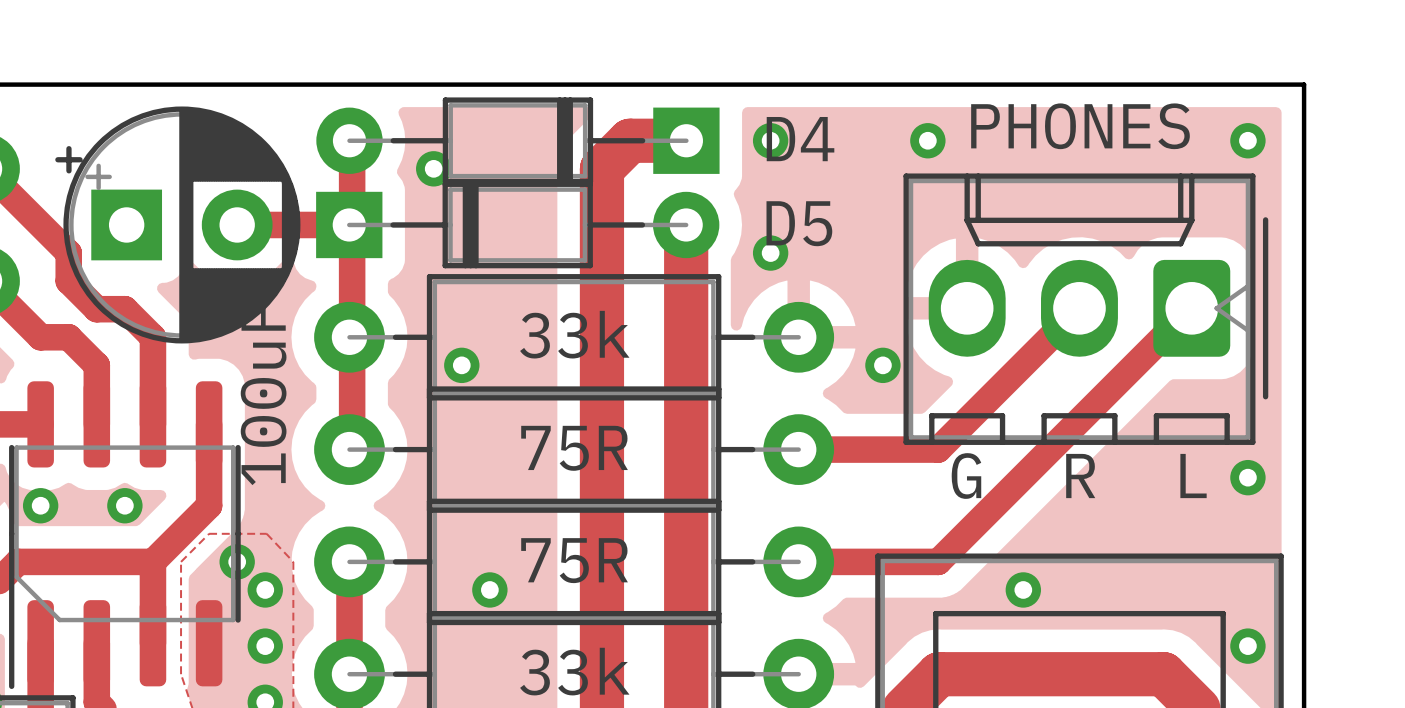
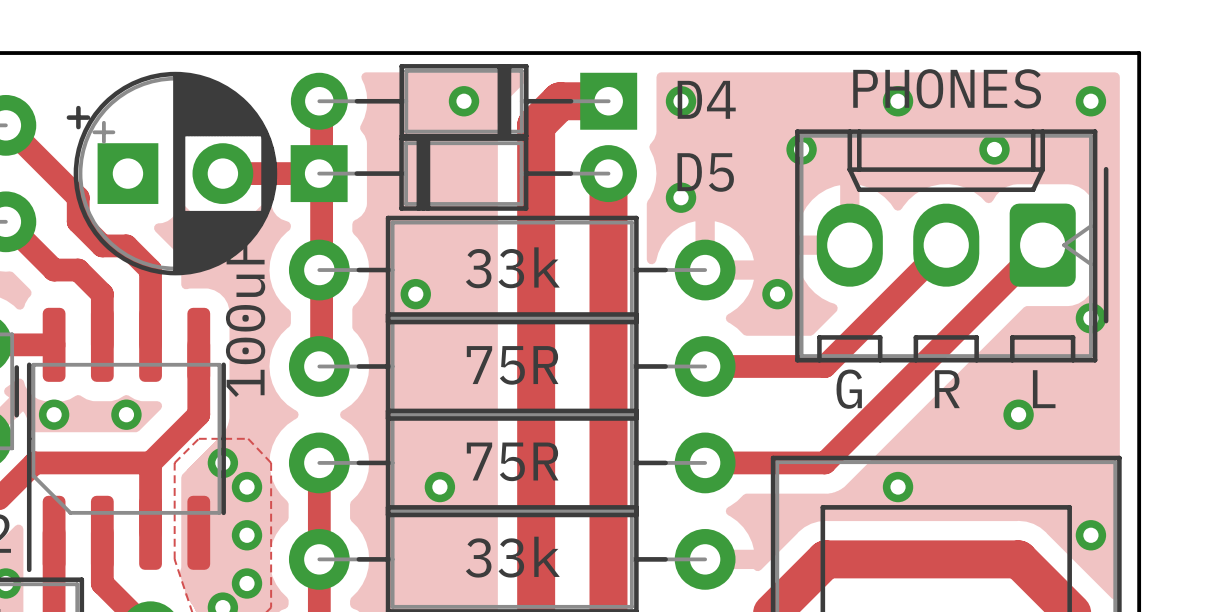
via: (927, 140) -> none
via: none -> (898, 101)
via position: (433, 168) -> (464, 101)
via: none -> (801, 149)
via: none -> (994, 149)
via: none -> (1090, 318)
via: (1247, 477) -> none
via: none -> (1018, 414)

